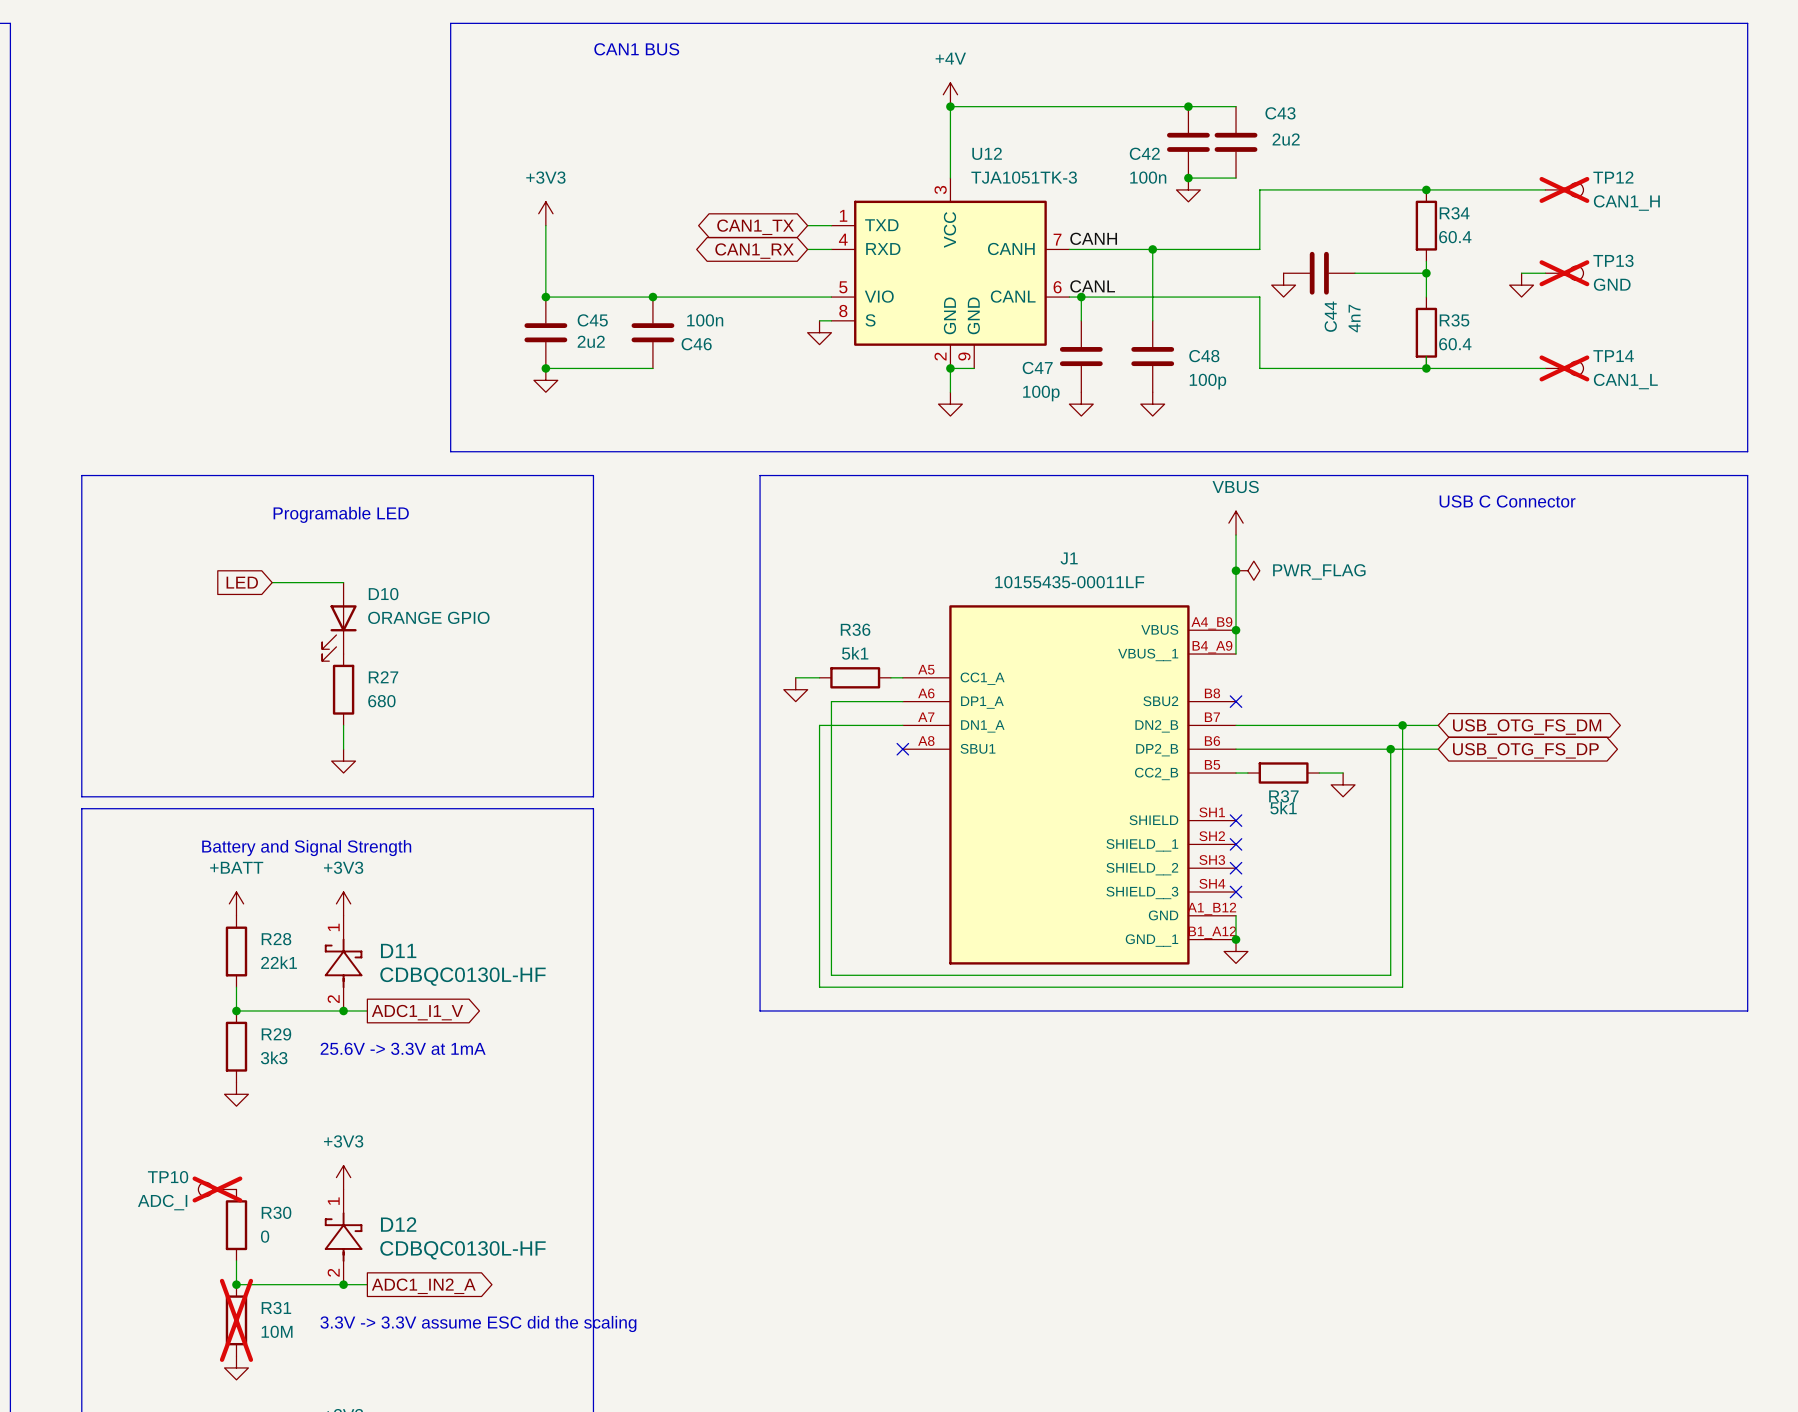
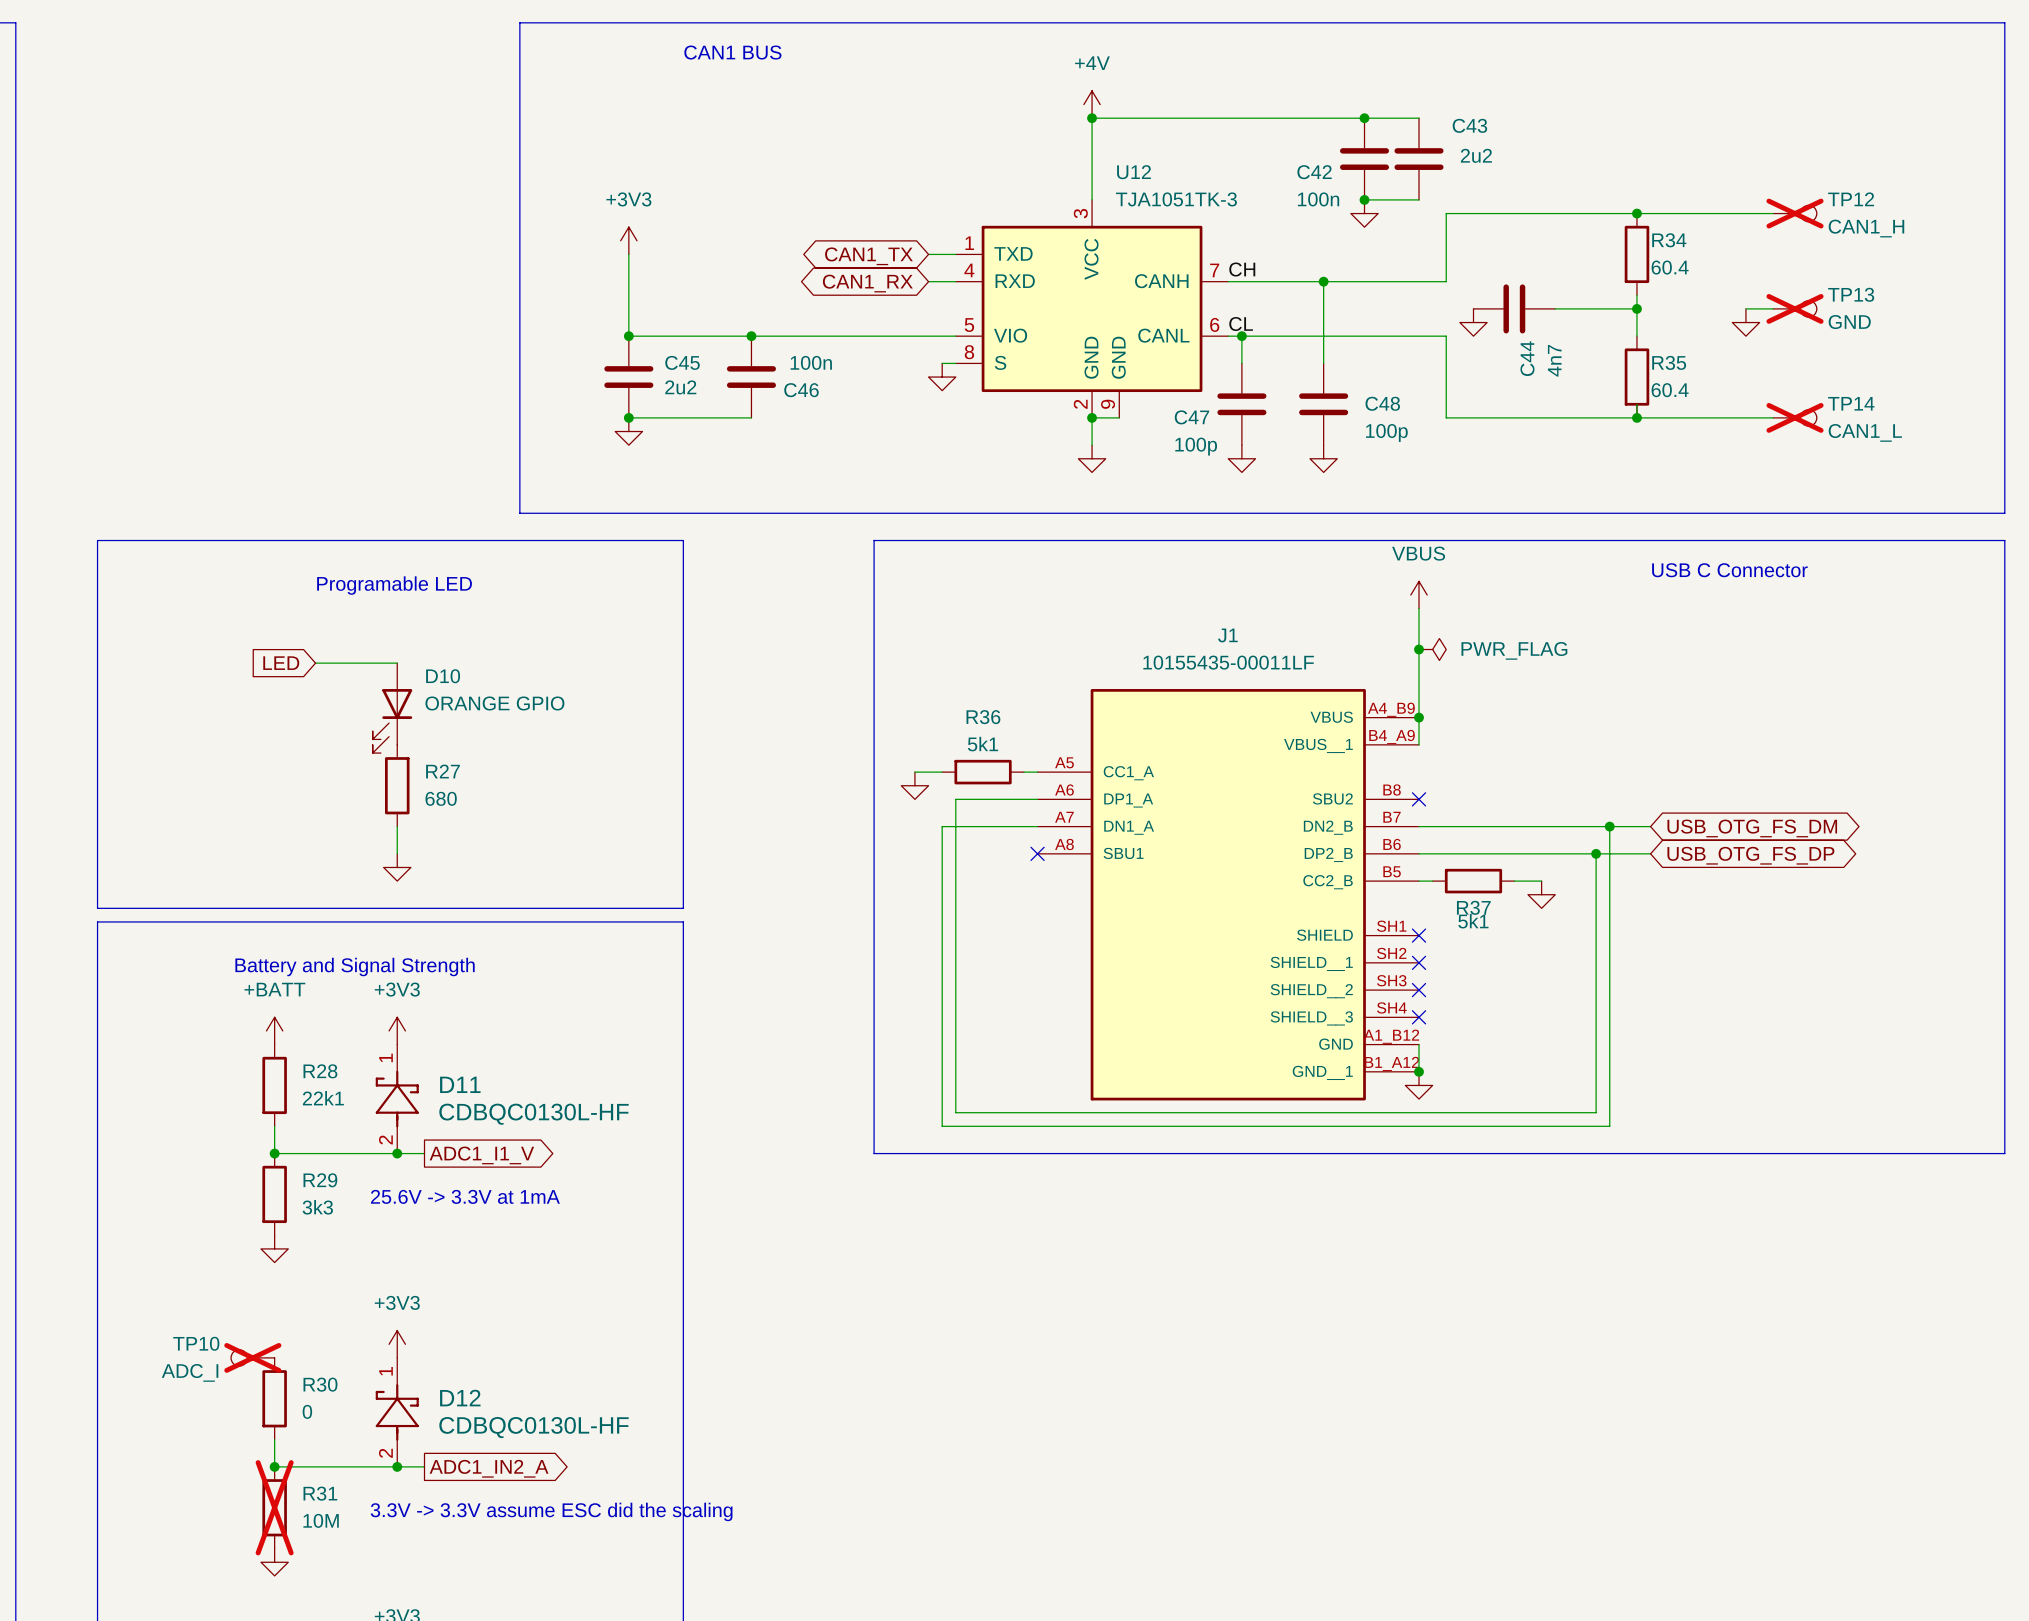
label: CANH (1093, 238) -> CH (1242, 269)
label: CANL (1092, 286) -> CL (1241, 324)

